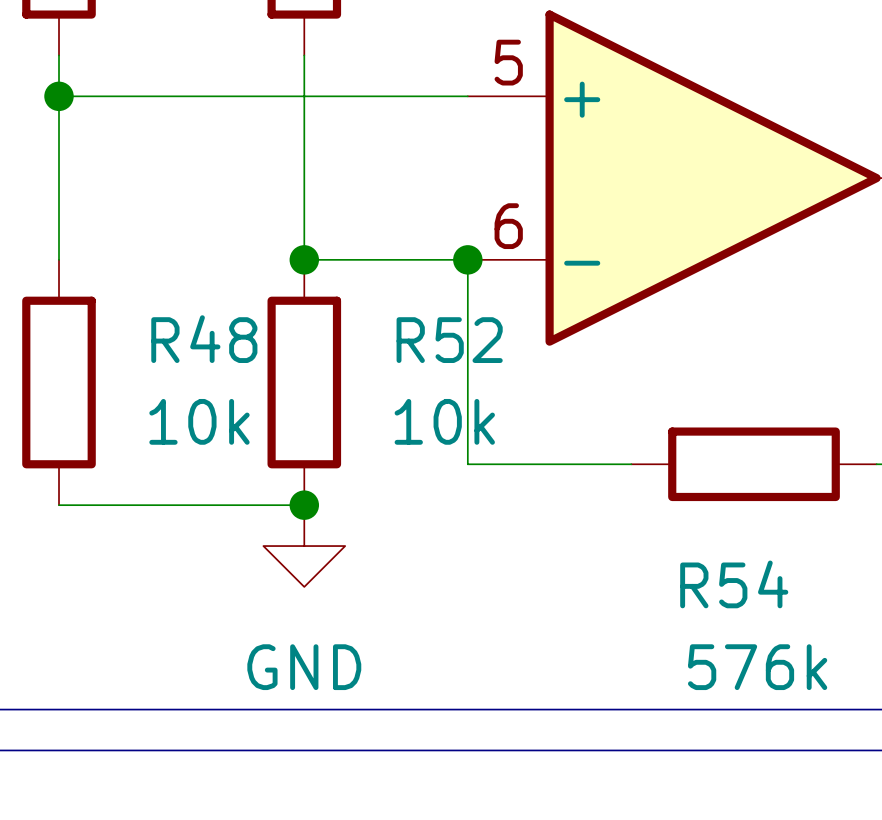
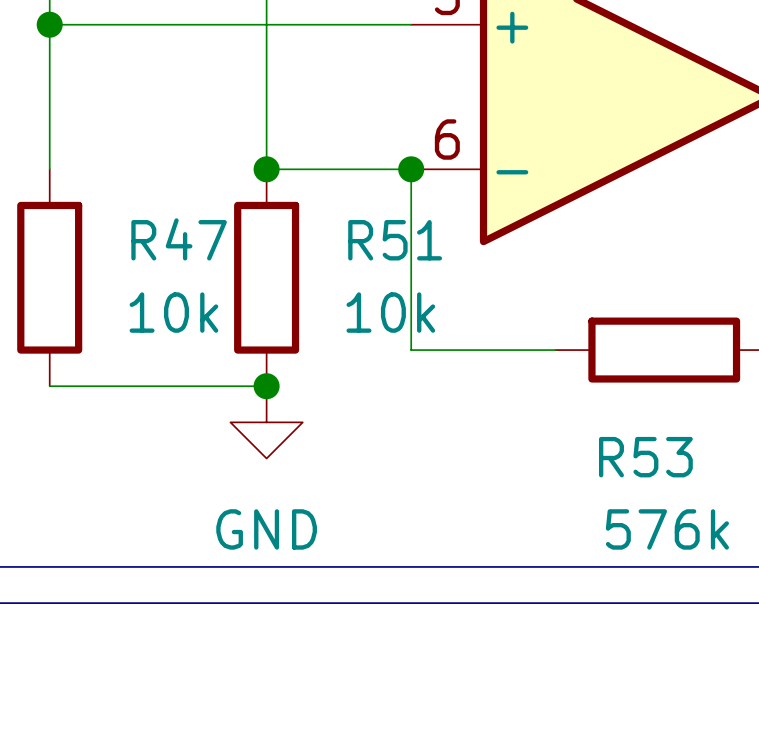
R48 name: R48 (204, 339) -> R47 (179, 239)
R52 name: R52 (449, 340) -> R51 (395, 240)
R54 name: R54 (734, 584) -> R53 (645, 457)

